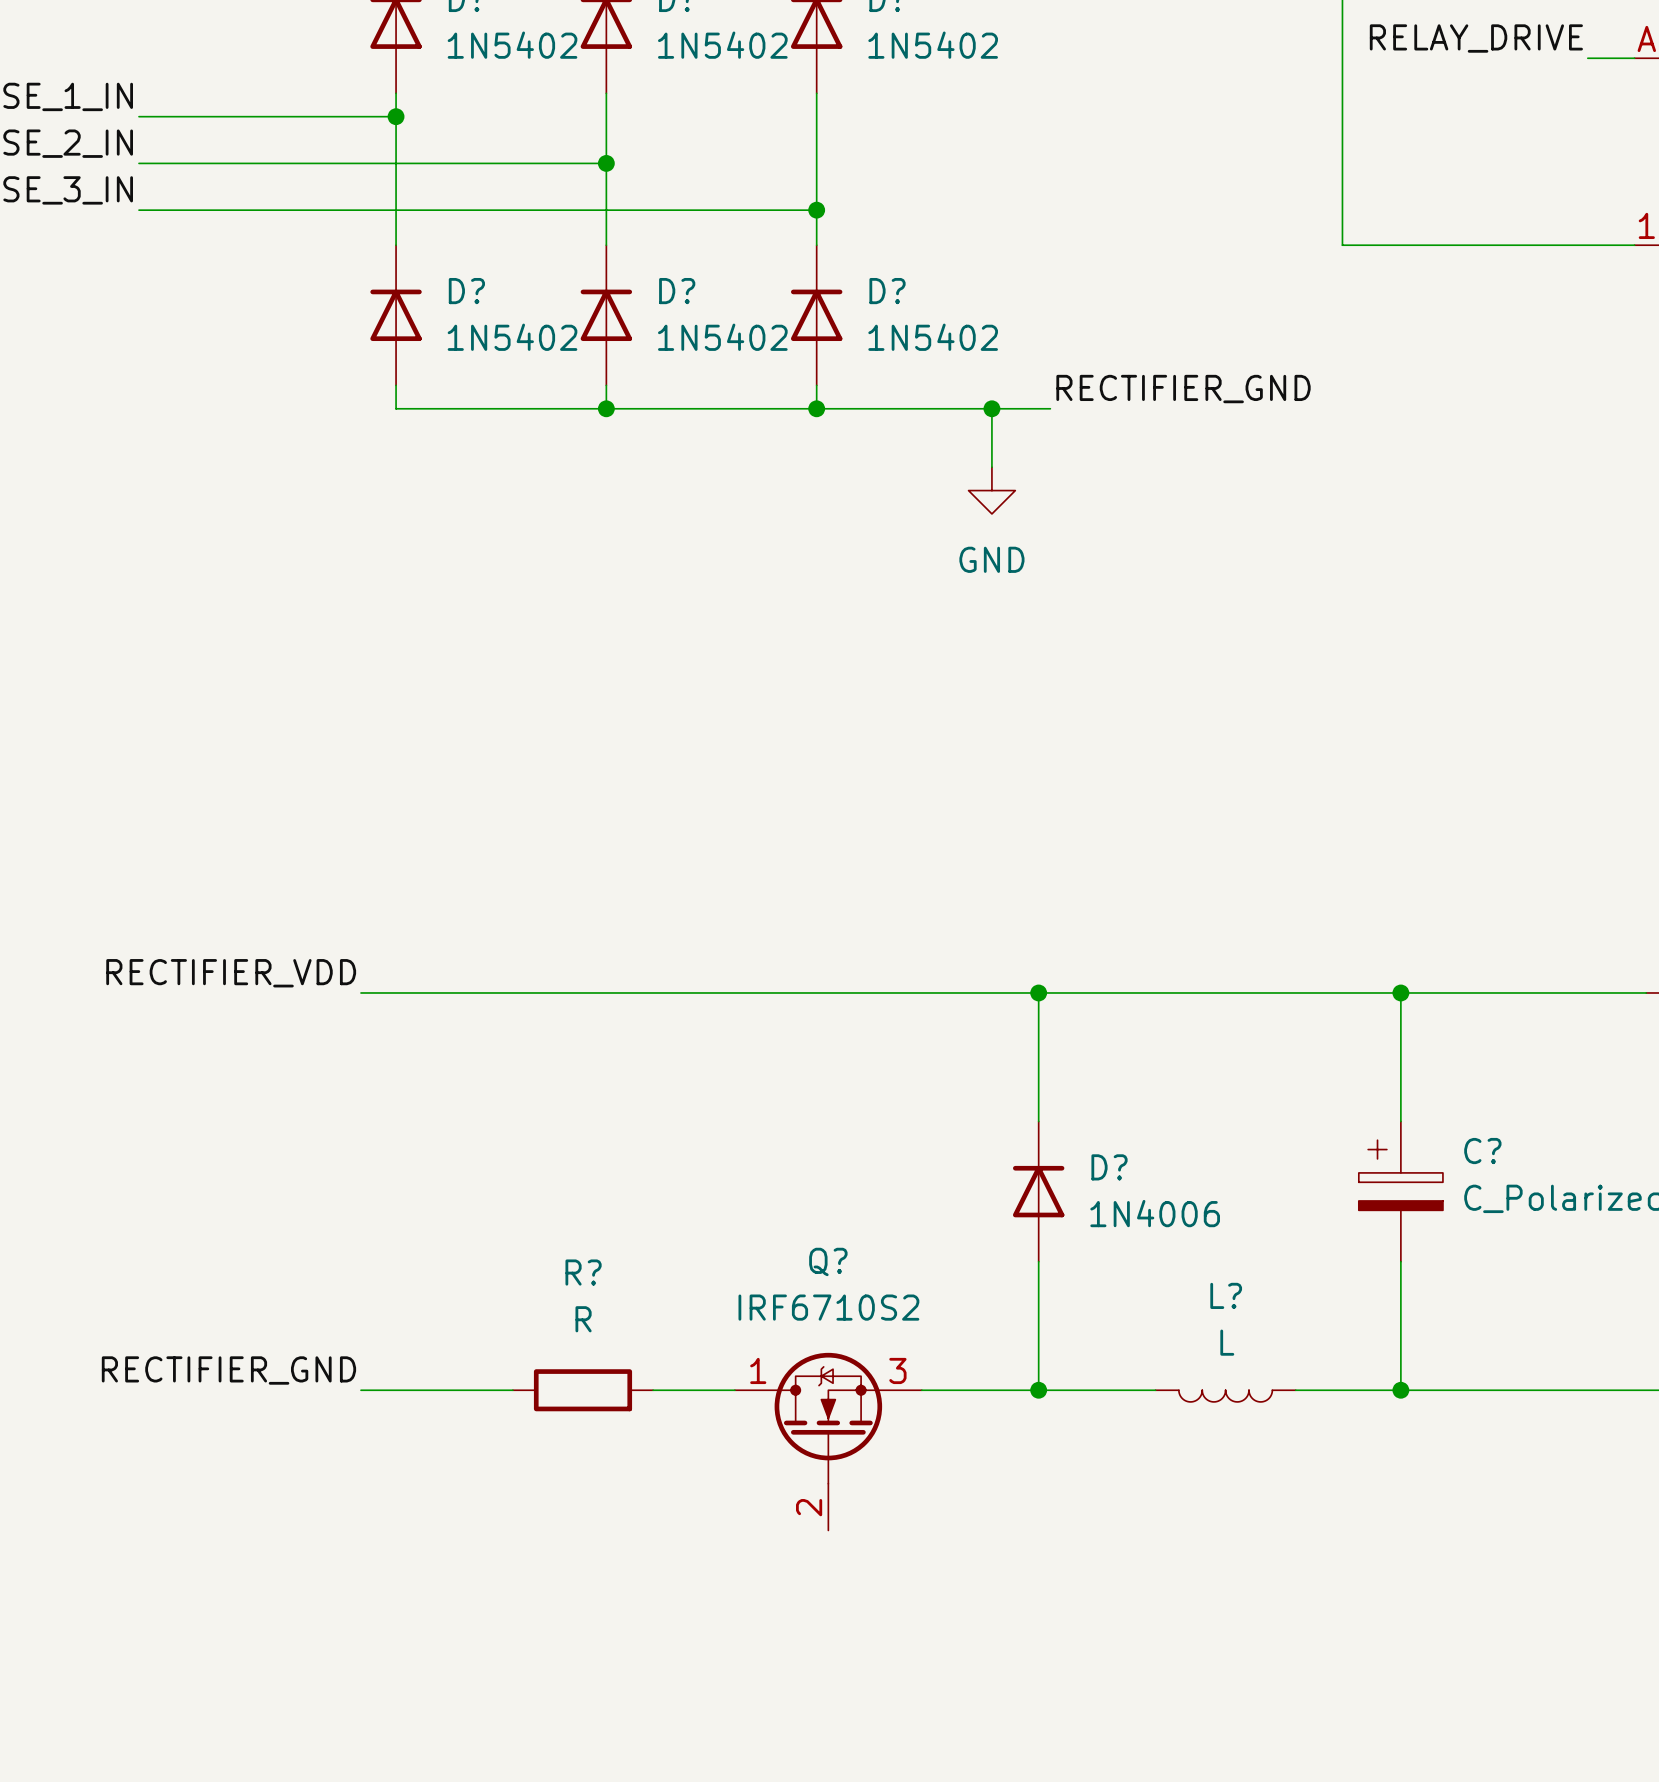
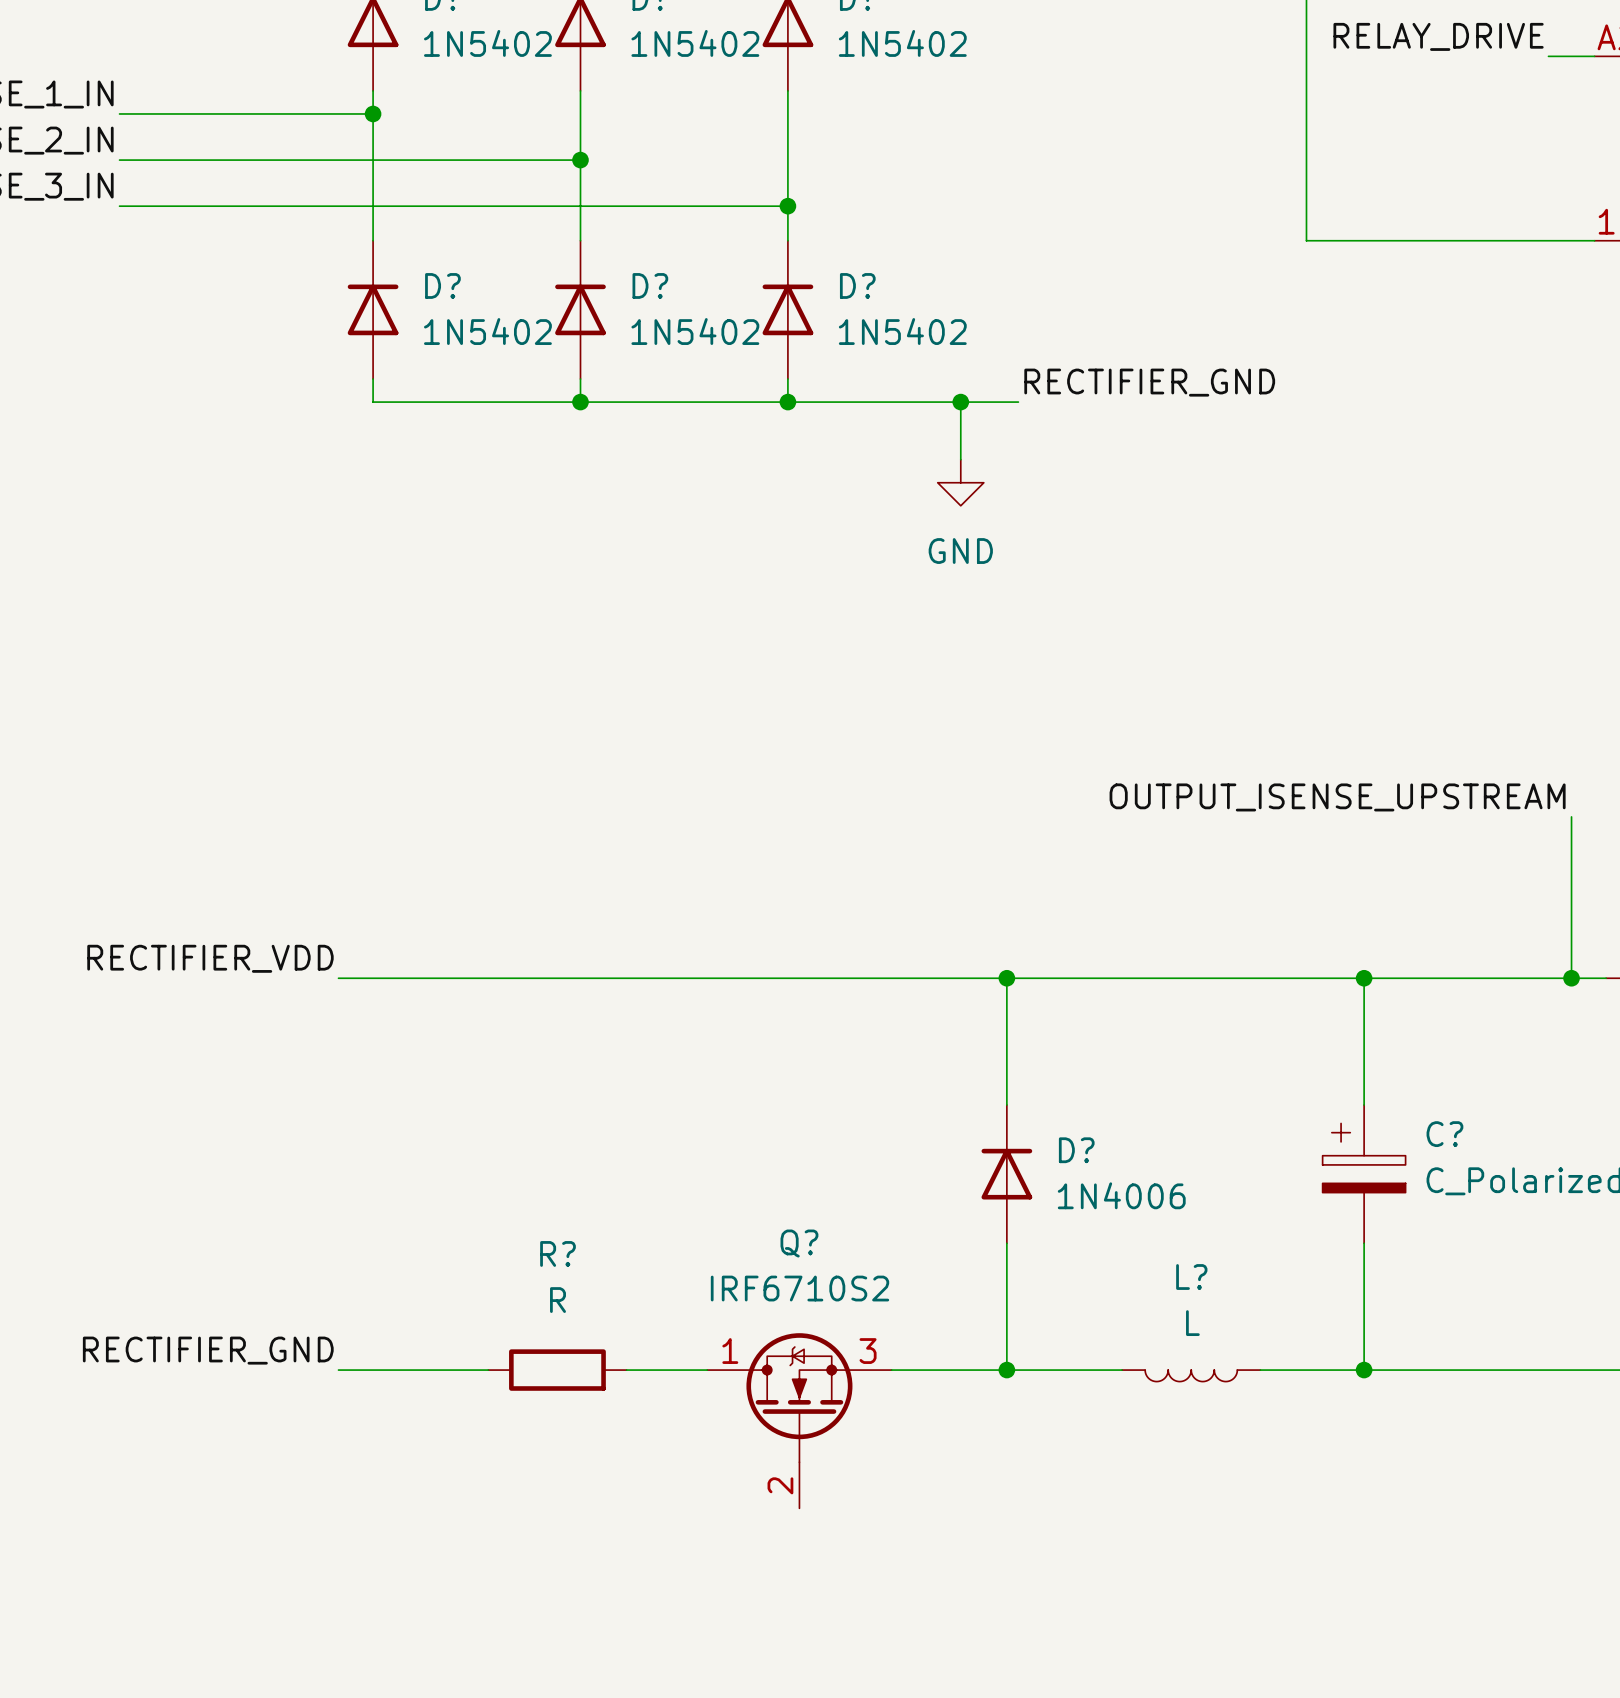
label: none -> OUTPUT_ISENSE_UPSTREAM (1337, 797)
wire: none -> (1571, 816) (1571, 978)
junction: none -> (1571, 978)

